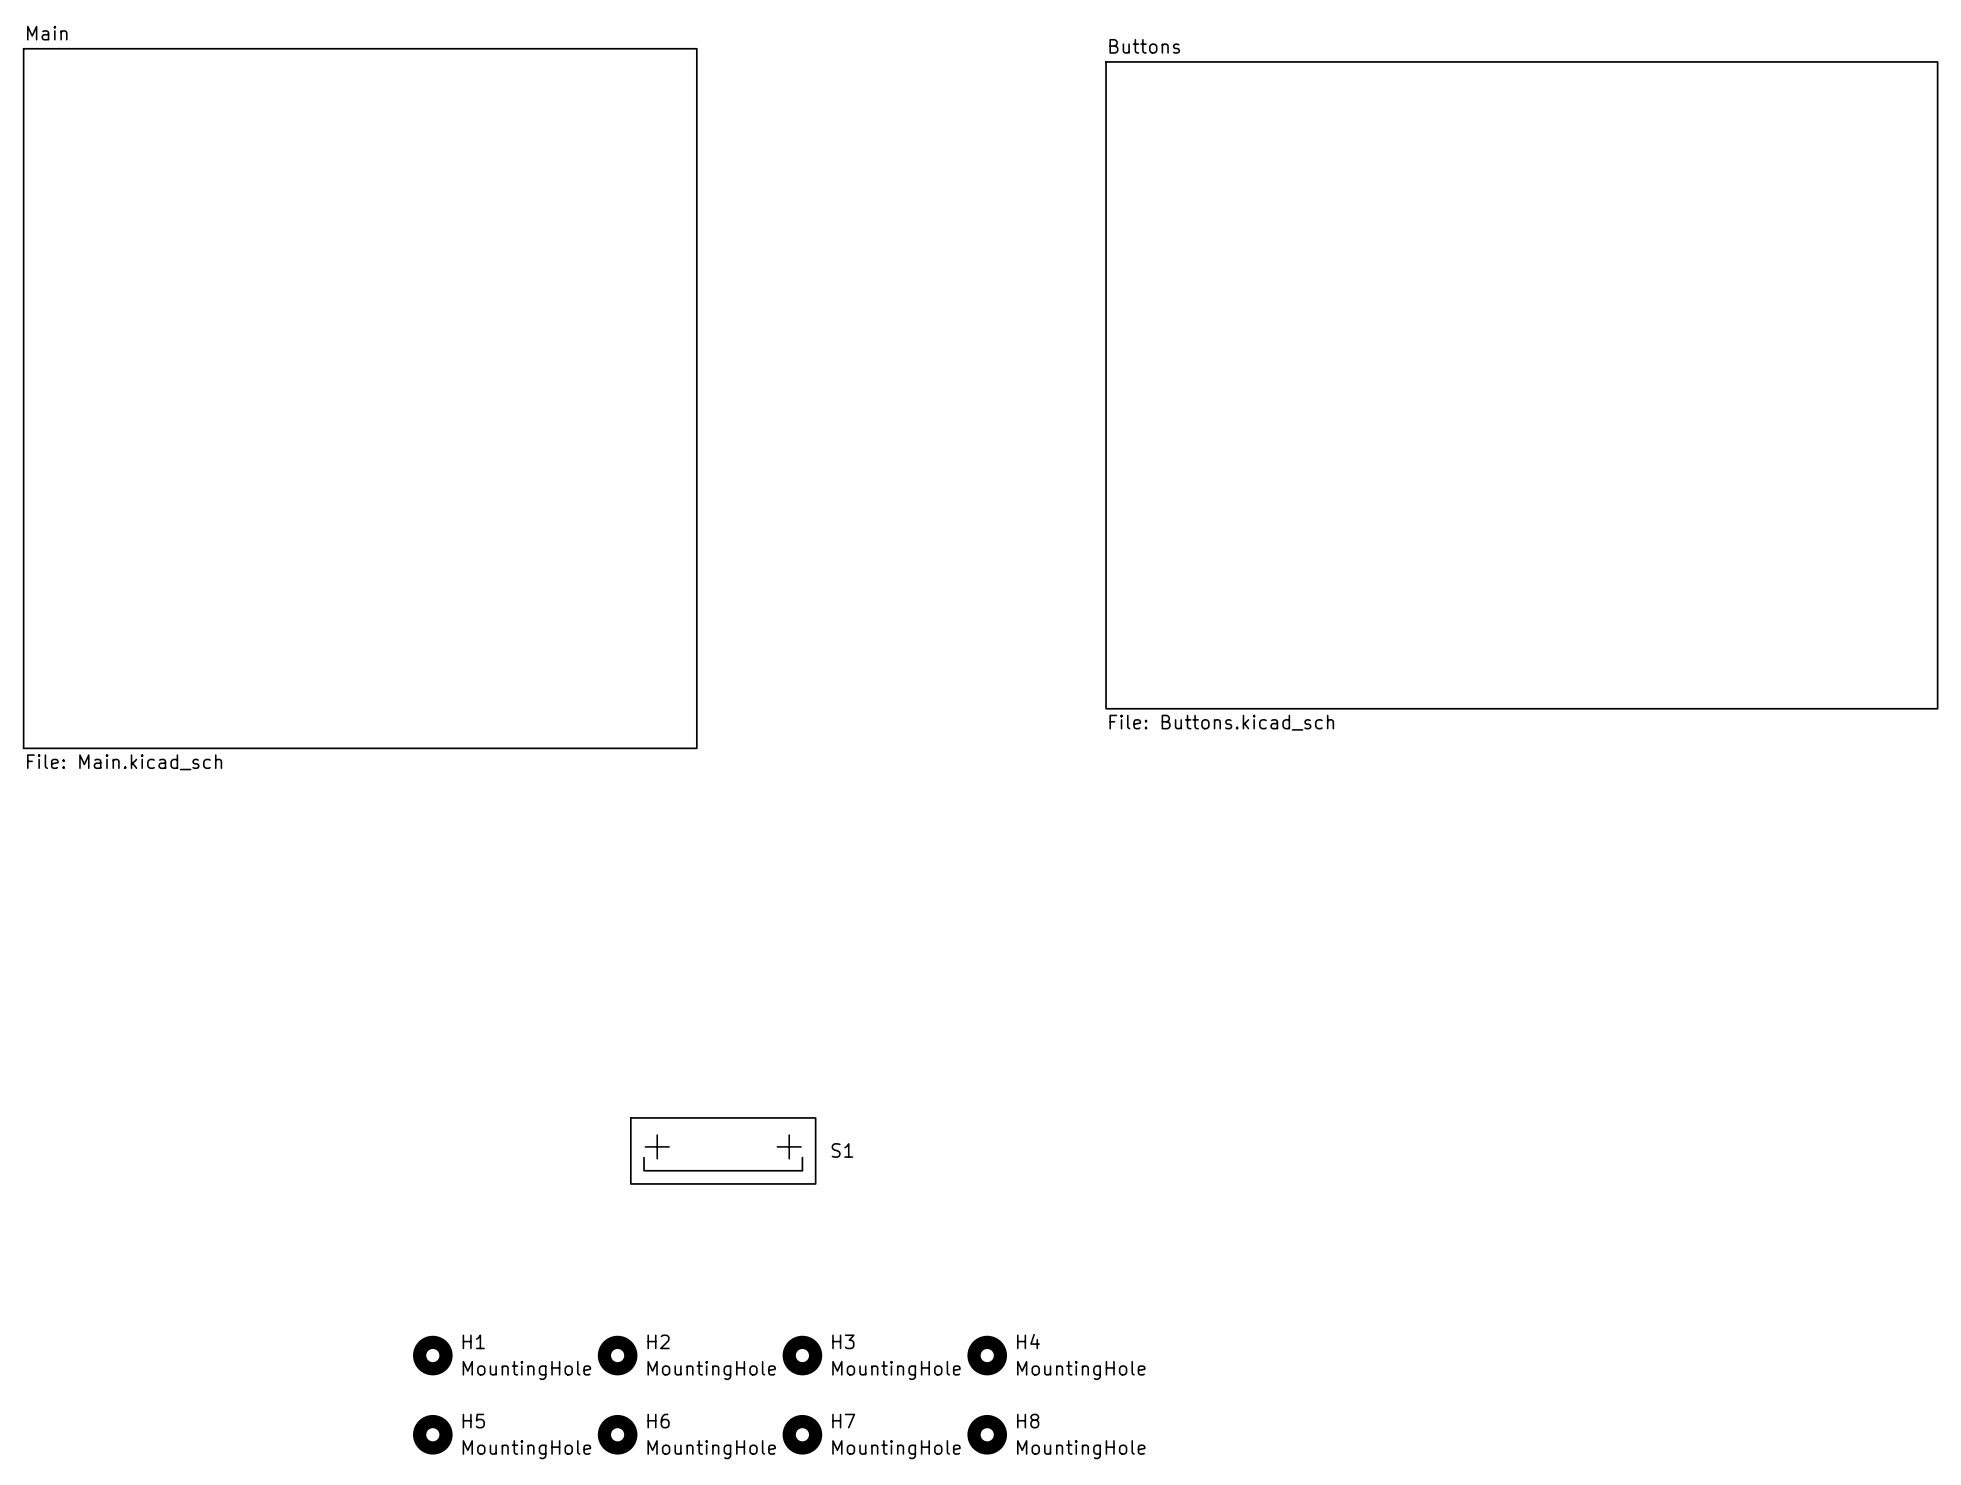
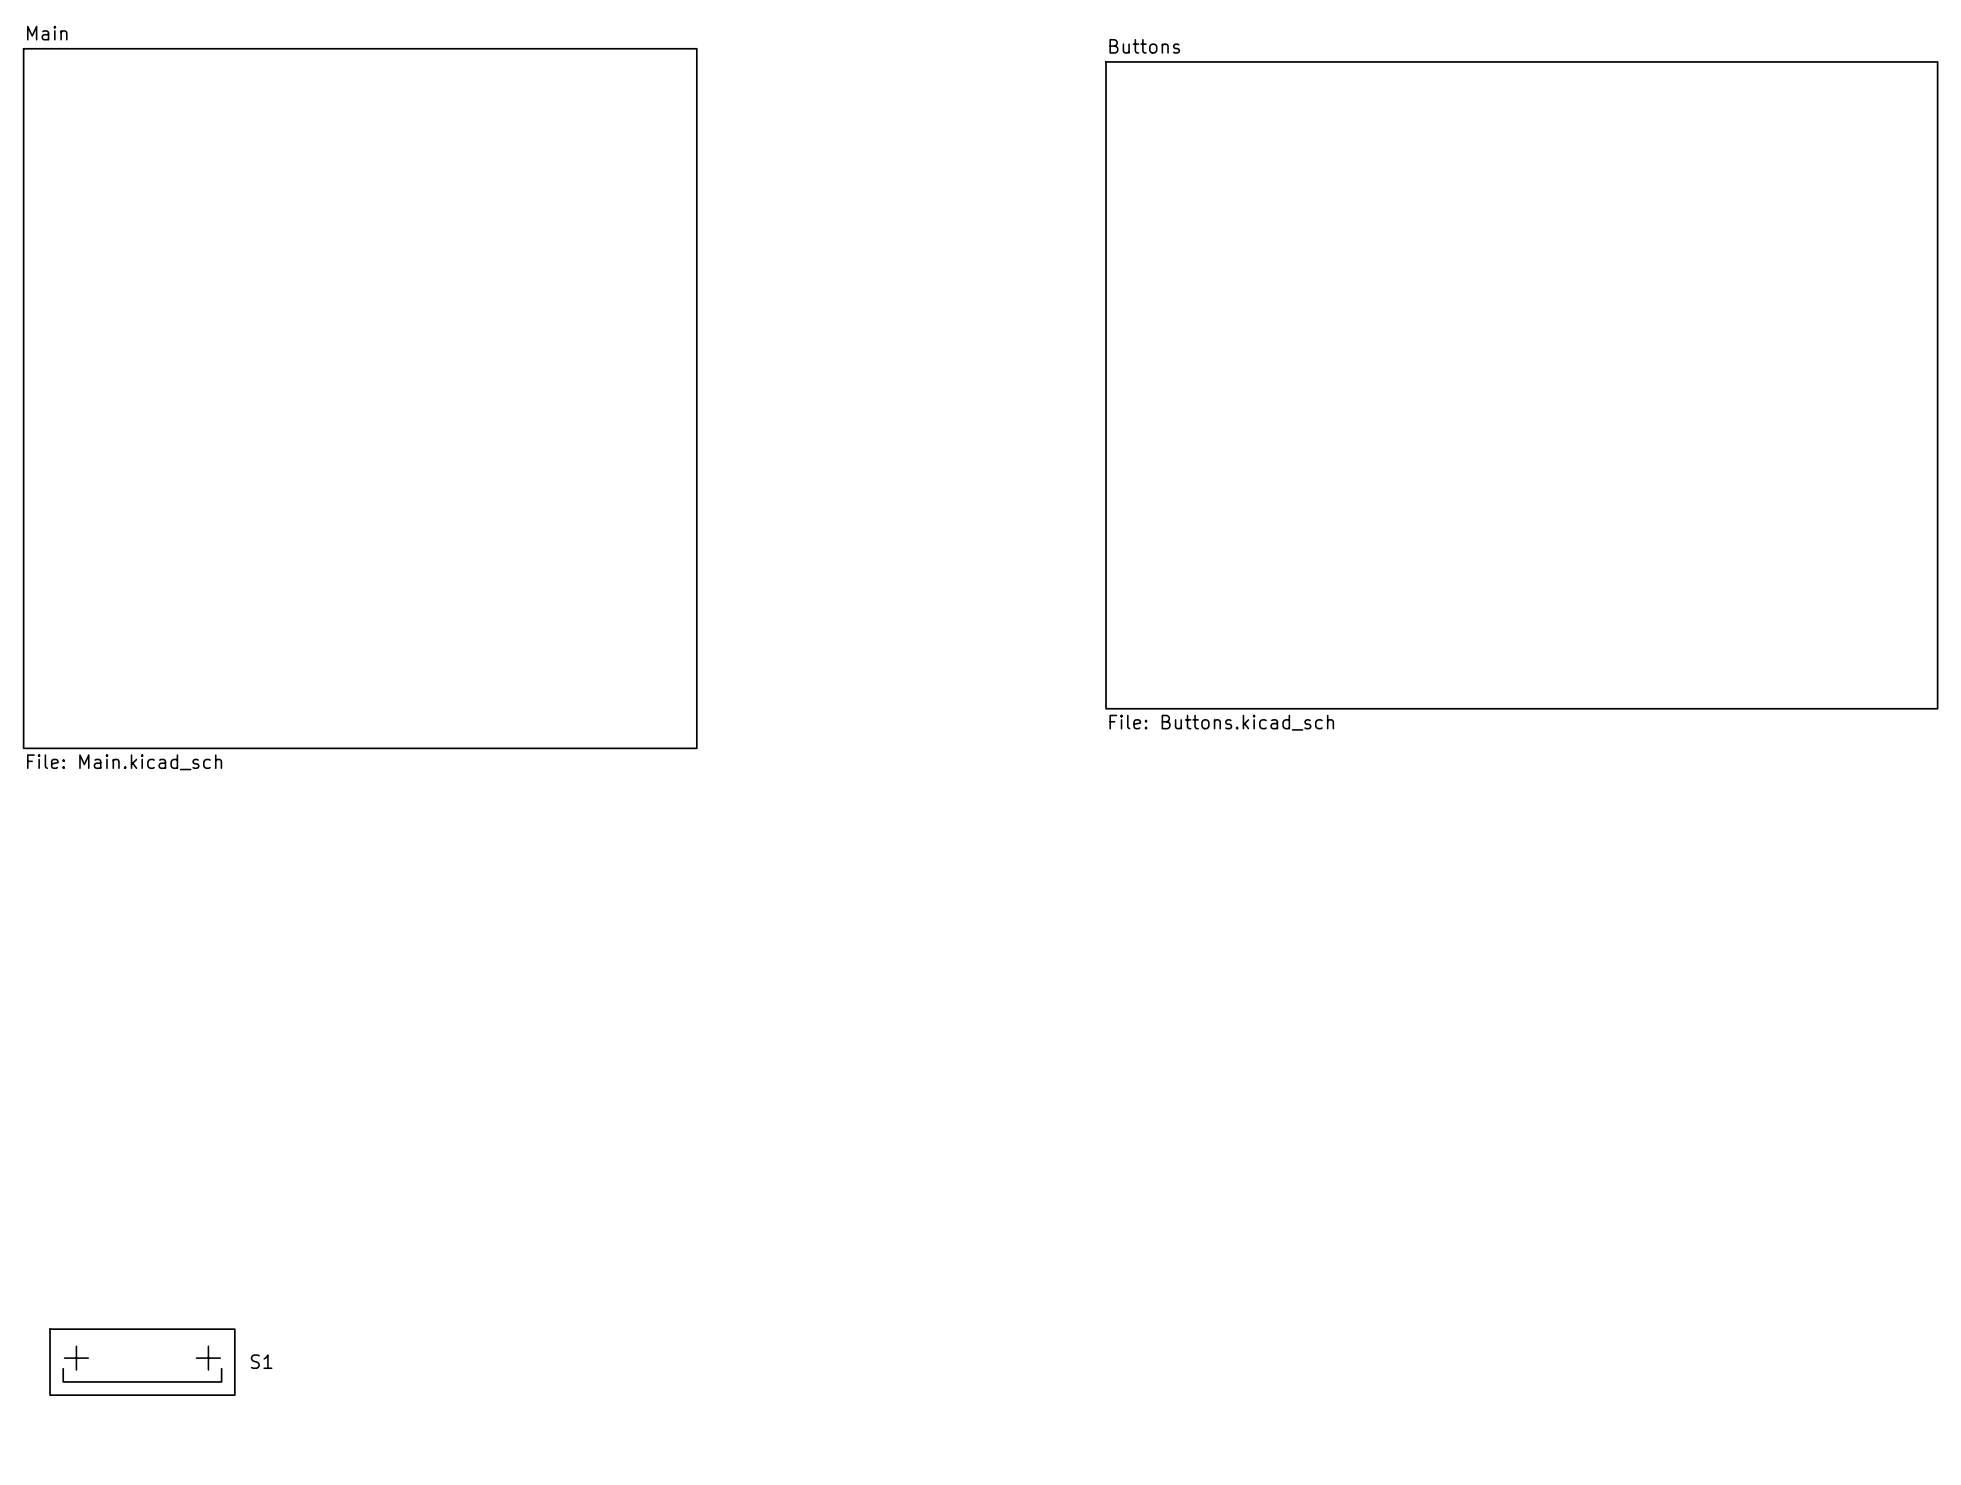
S1 position: (723, 1150) -> (142, 1362)
H1: MountingHole (432, 1355) -> none
H2: MountingHole (617, 1355) -> none
H3: MountingHole (802, 1355) -> none
H4: MountingHole (987, 1355) -> none
H5: MountingHole (432, 1434) -> none
H6: MountingHole (617, 1434) -> none
H7: MountingHole (802, 1434) -> none
H8: MountingHole (987, 1434) -> none

